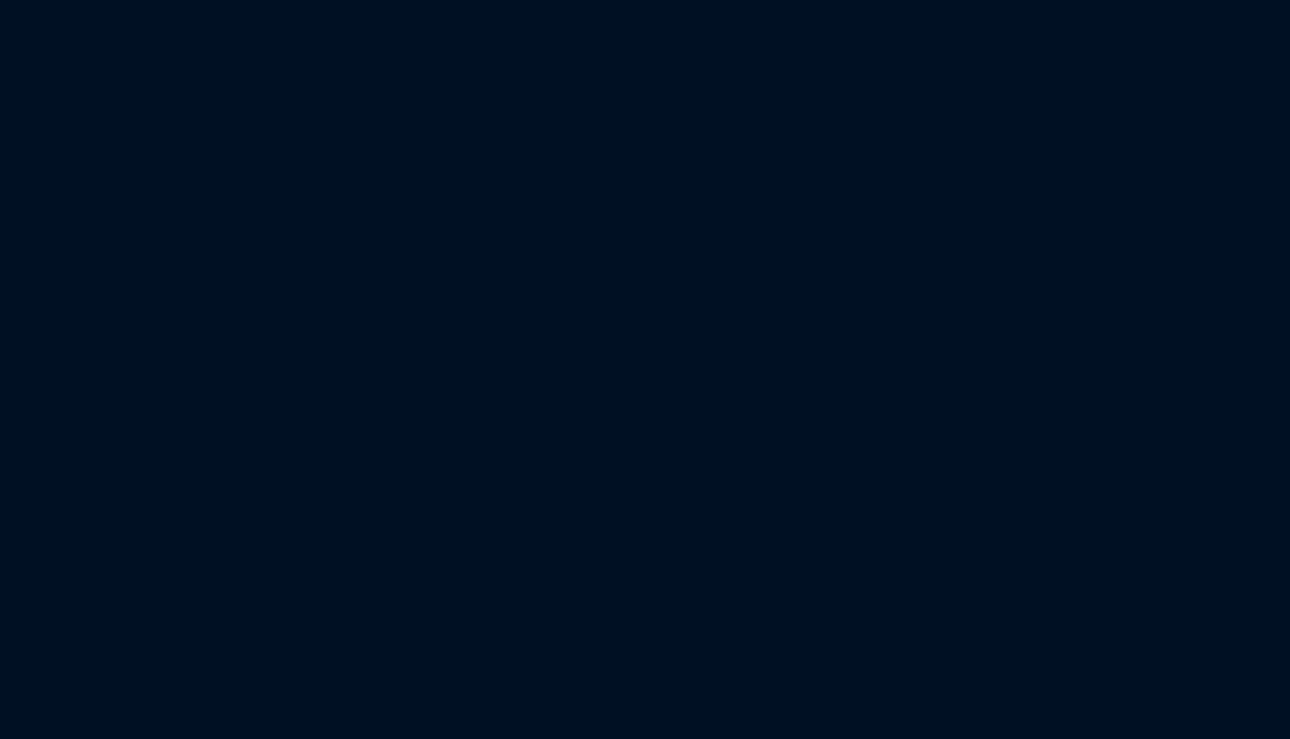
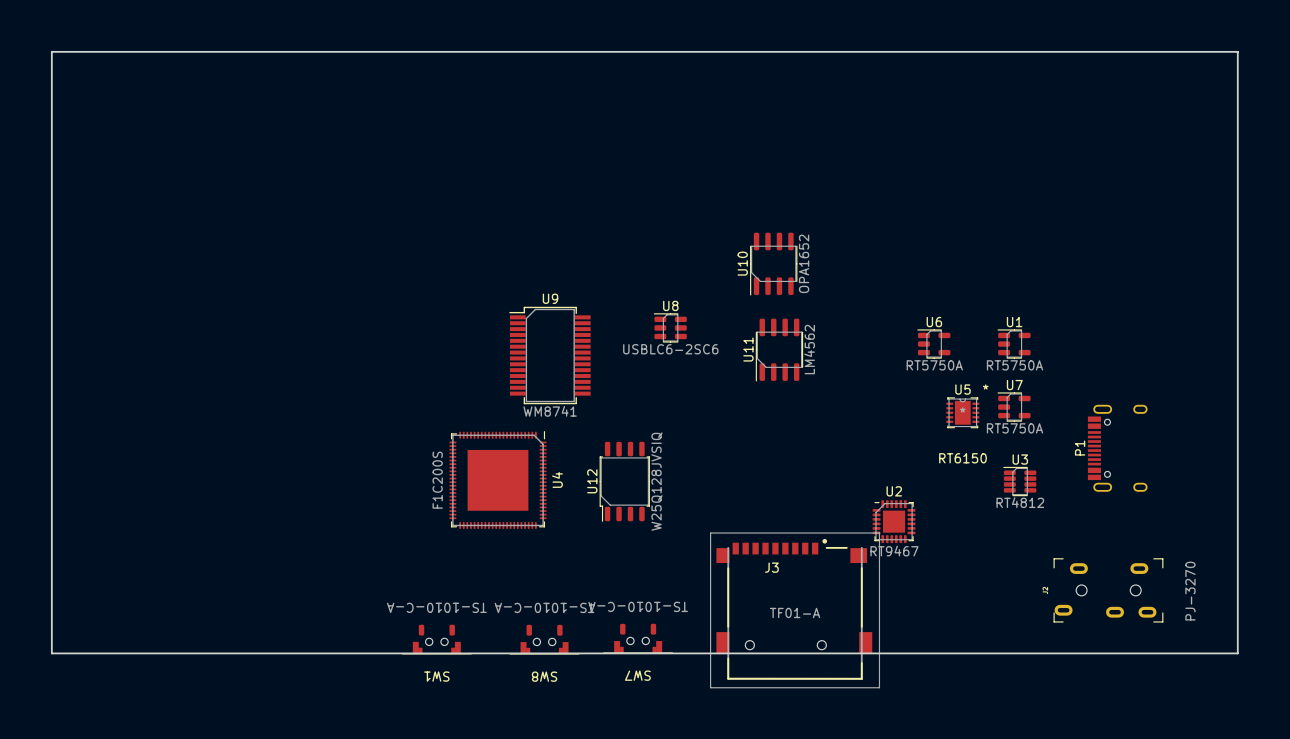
board edge: none -> (51, 51) (1237, 51) (1237, 653) (51, 653) (51, 51)
U10: none -> OPA1652 (773, 264)
U8: none -> USBLC6-2SC6 (670, 327)
U6: none -> RT5750A (933, 344)
U1: none -> RT5750A (1014, 344)
U11: none -> LM4562 (779, 350)
U9: none -> WM8741 (549, 355)
U7: none -> RT5750A (1014, 407)
U5: none -> RT6150 (962, 412)
P1: none -> (1117, 448)
U4: none -> F1C200S (498, 480)
U12: none -> W25Q128JVSIQ (624, 481)
U3: none -> RT4812 (1019, 481)
U2: none -> RT9467 (894, 521)
part: none -> PJ-3270 (1108, 590)
J3: none -> TF01-A (795, 610)
SW7: none -> TS-1010-C-A (638, 638)
SW1: none -> TS-1010-C-A (436, 639)
SW8: none -> TS-1010-C-A (544, 639)

